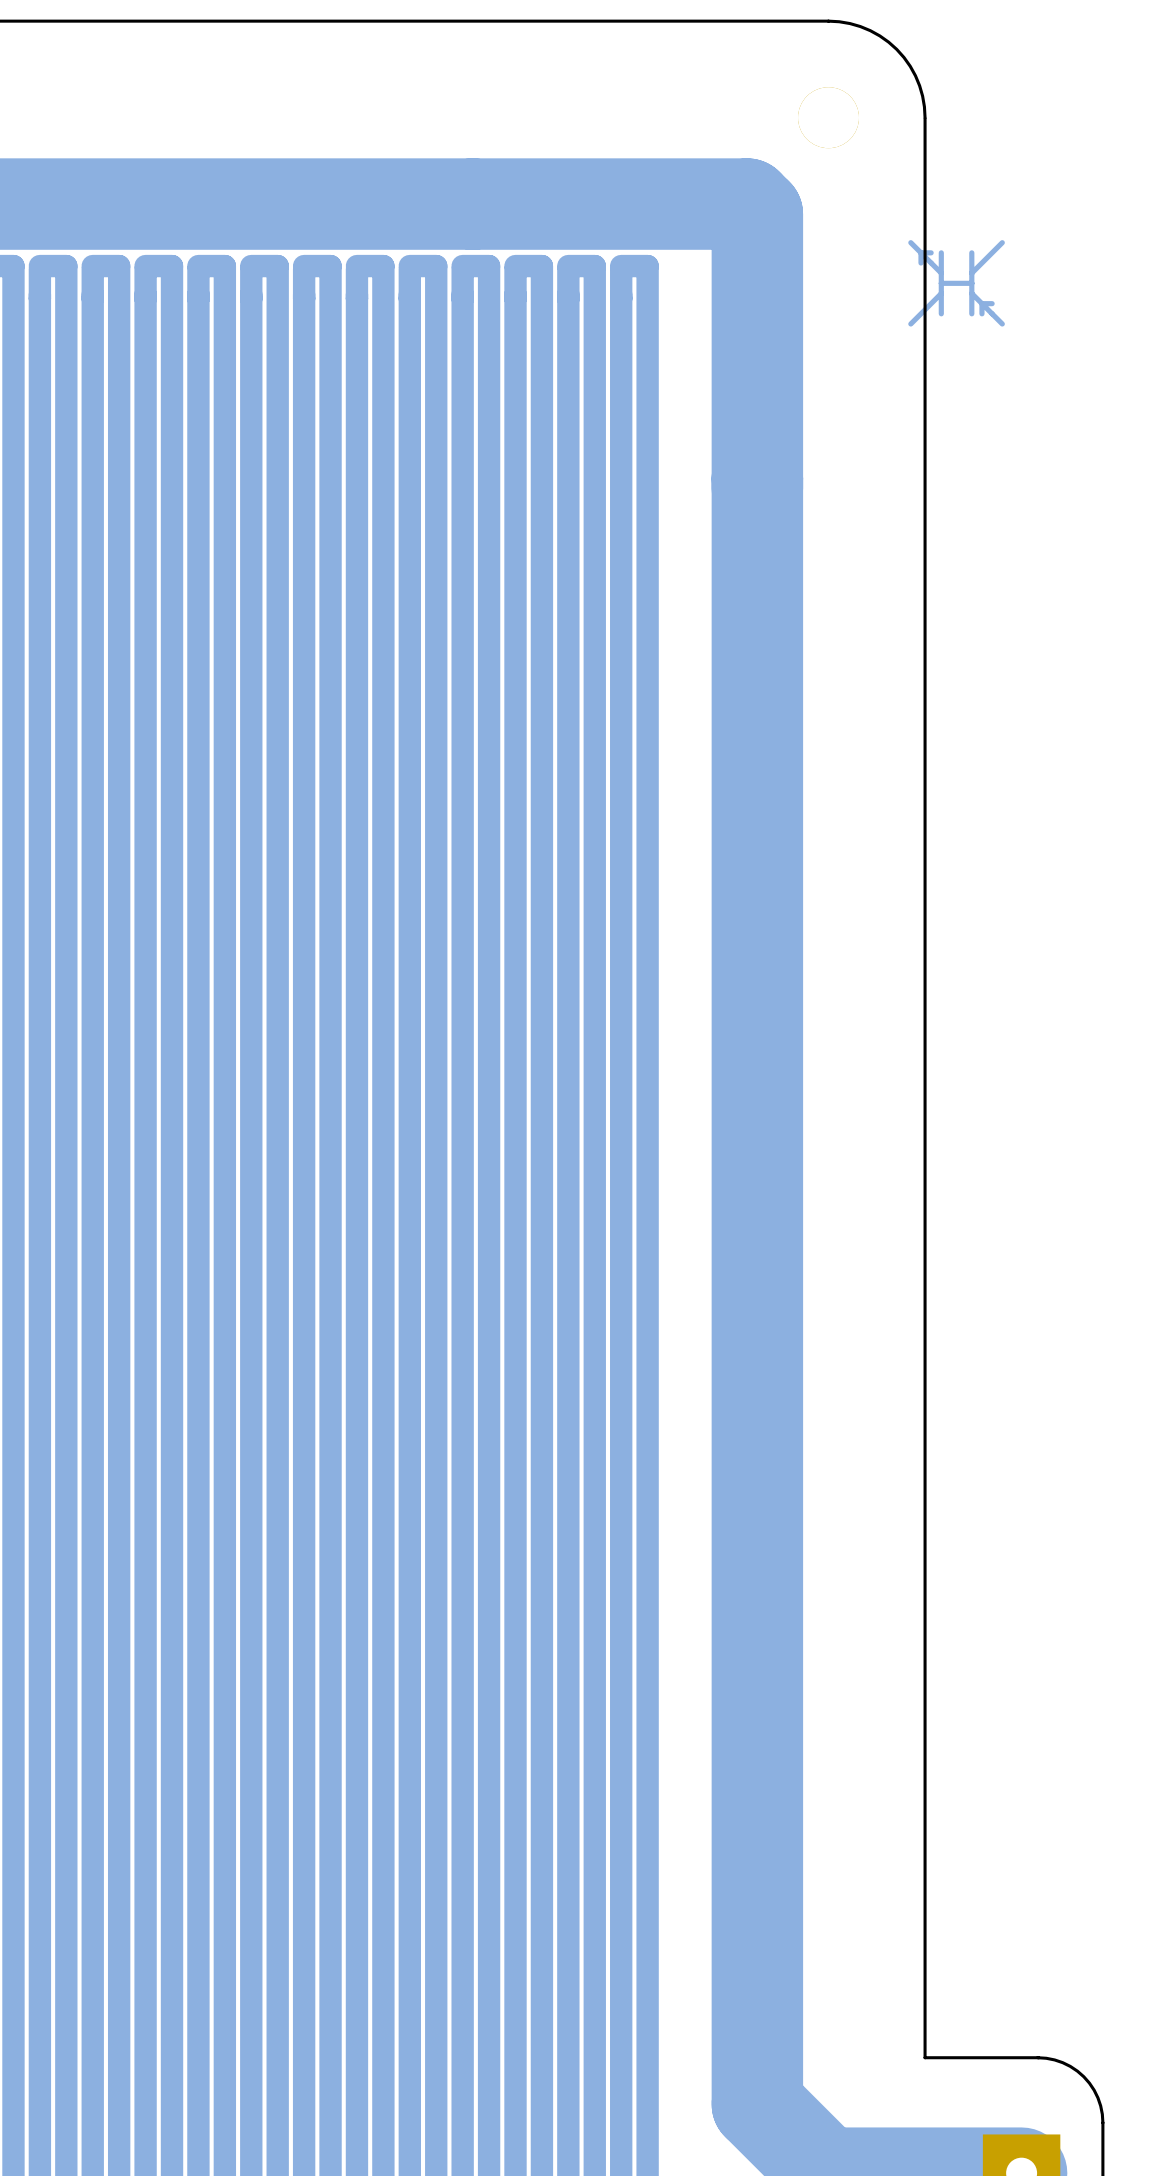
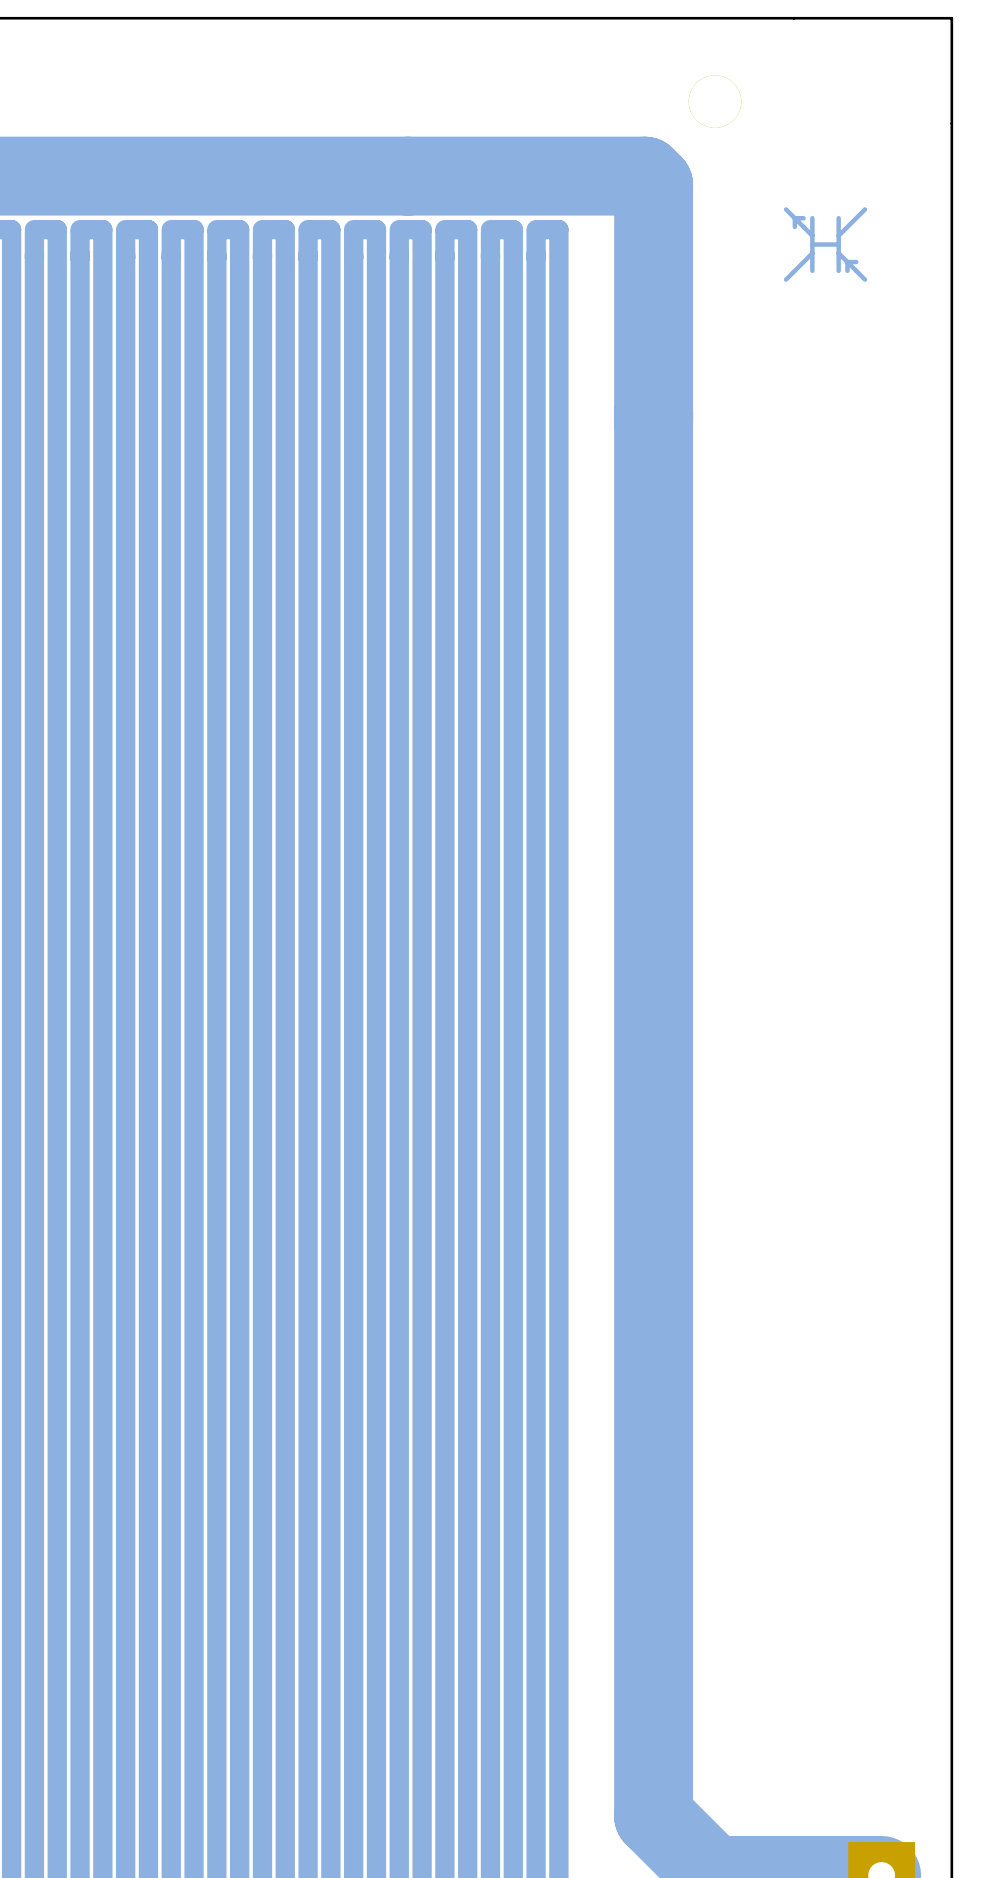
board edge: (828, 21) (849, 23) (870, 30) (896, 49) (910, 66) (919, 85) (925, 117) -> (715, 18) (951, 18) (951, 1831)
board edge: (925, 118) (925, 2057) (1038, 2057) -> none
board edge: (1037, 2057) (1062, 2062) (1083, 2076) (1097, 2097) (1102, 2122) -> none

